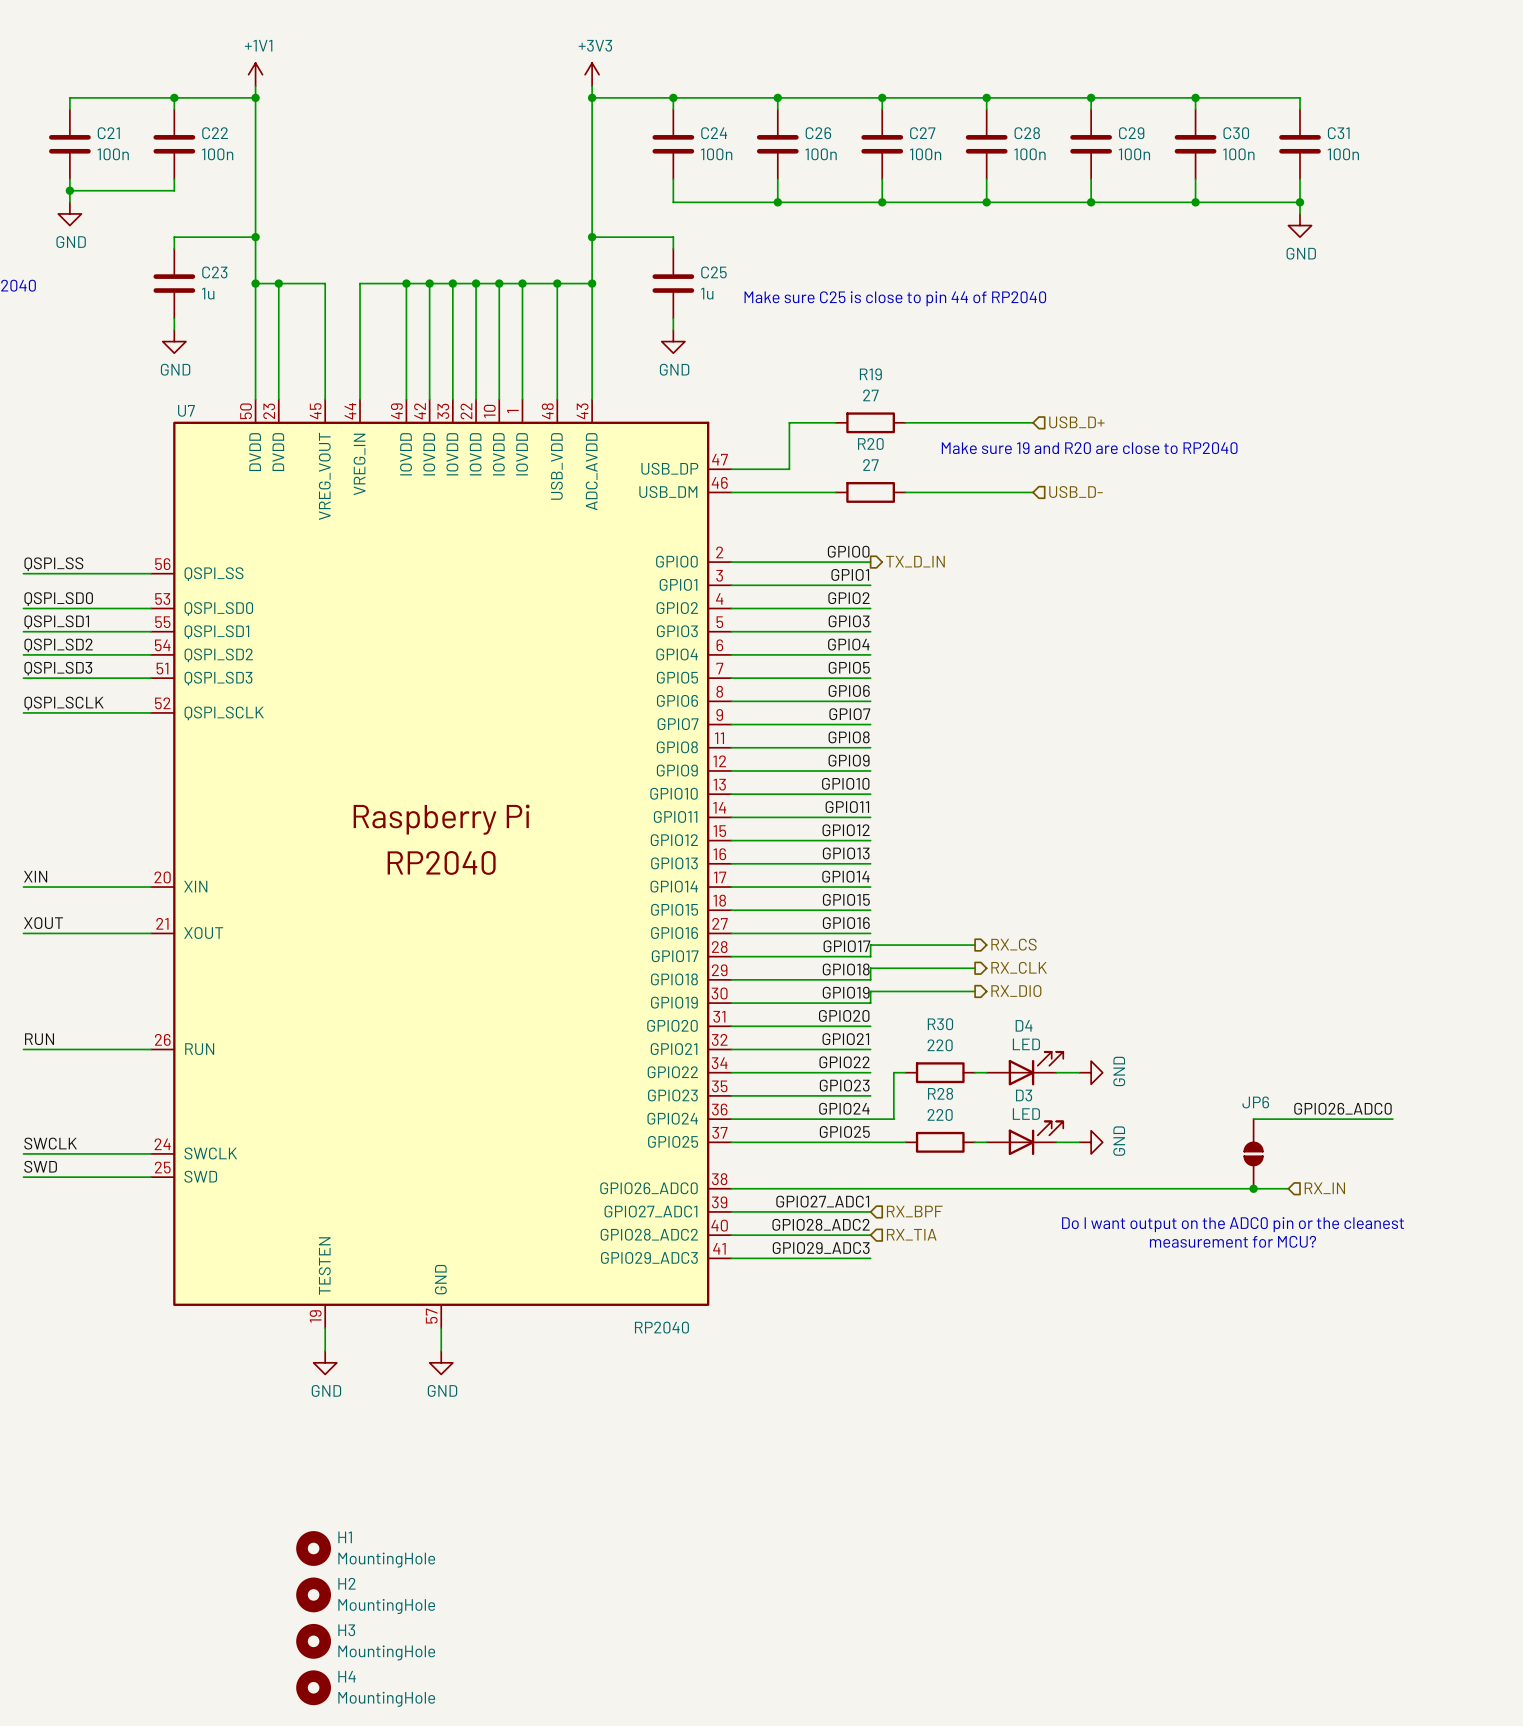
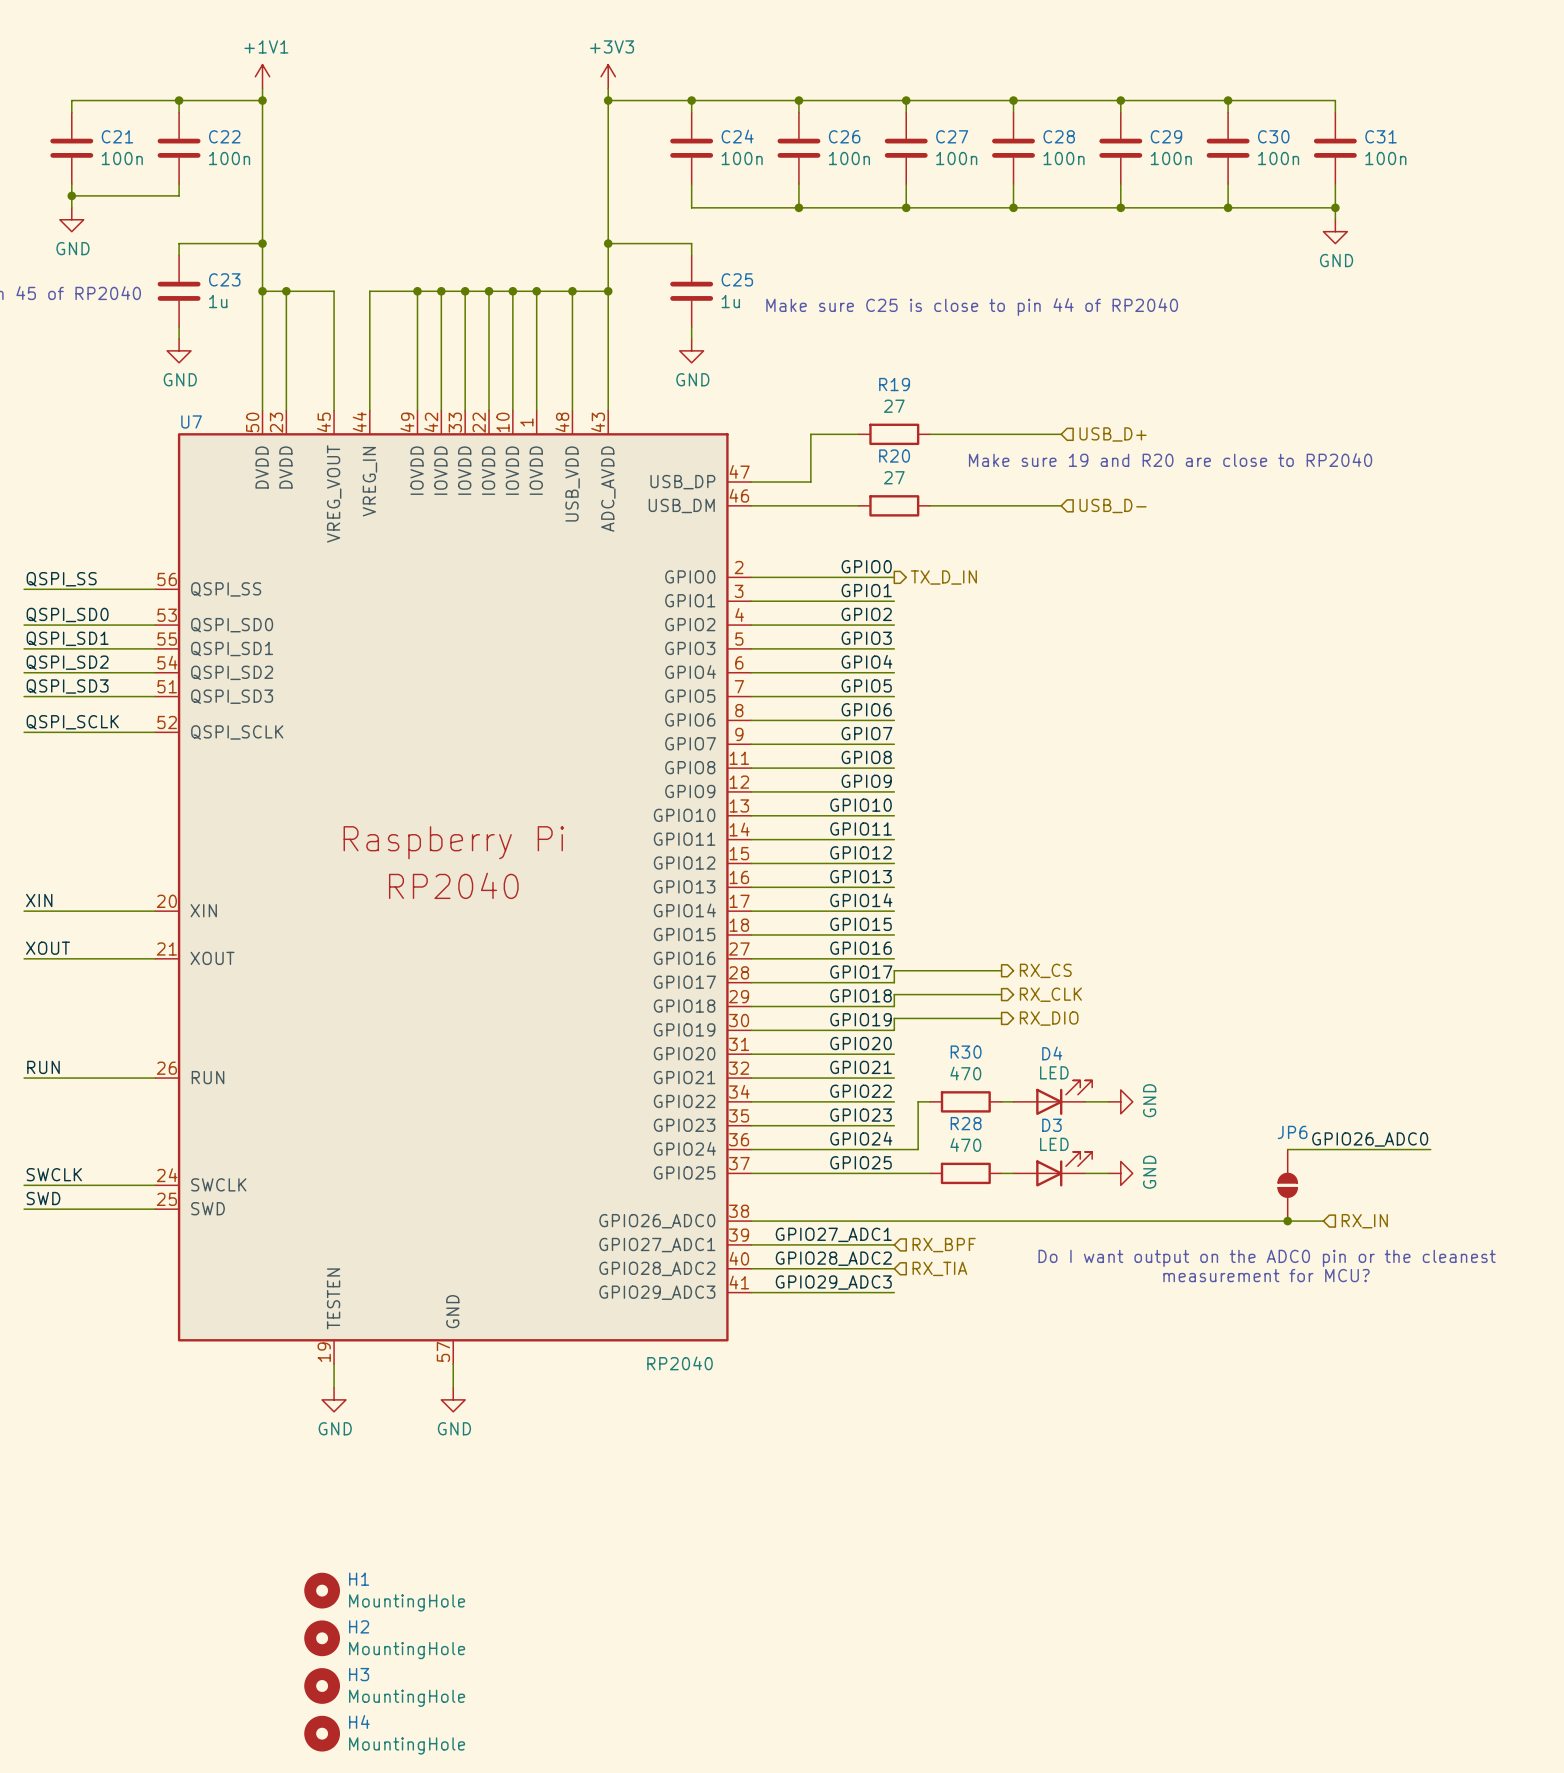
R30 value: 220 (940, 1045) -> 470 (965, 1073)
R28 value: 220 (940, 1114) -> 470 (965, 1145)

